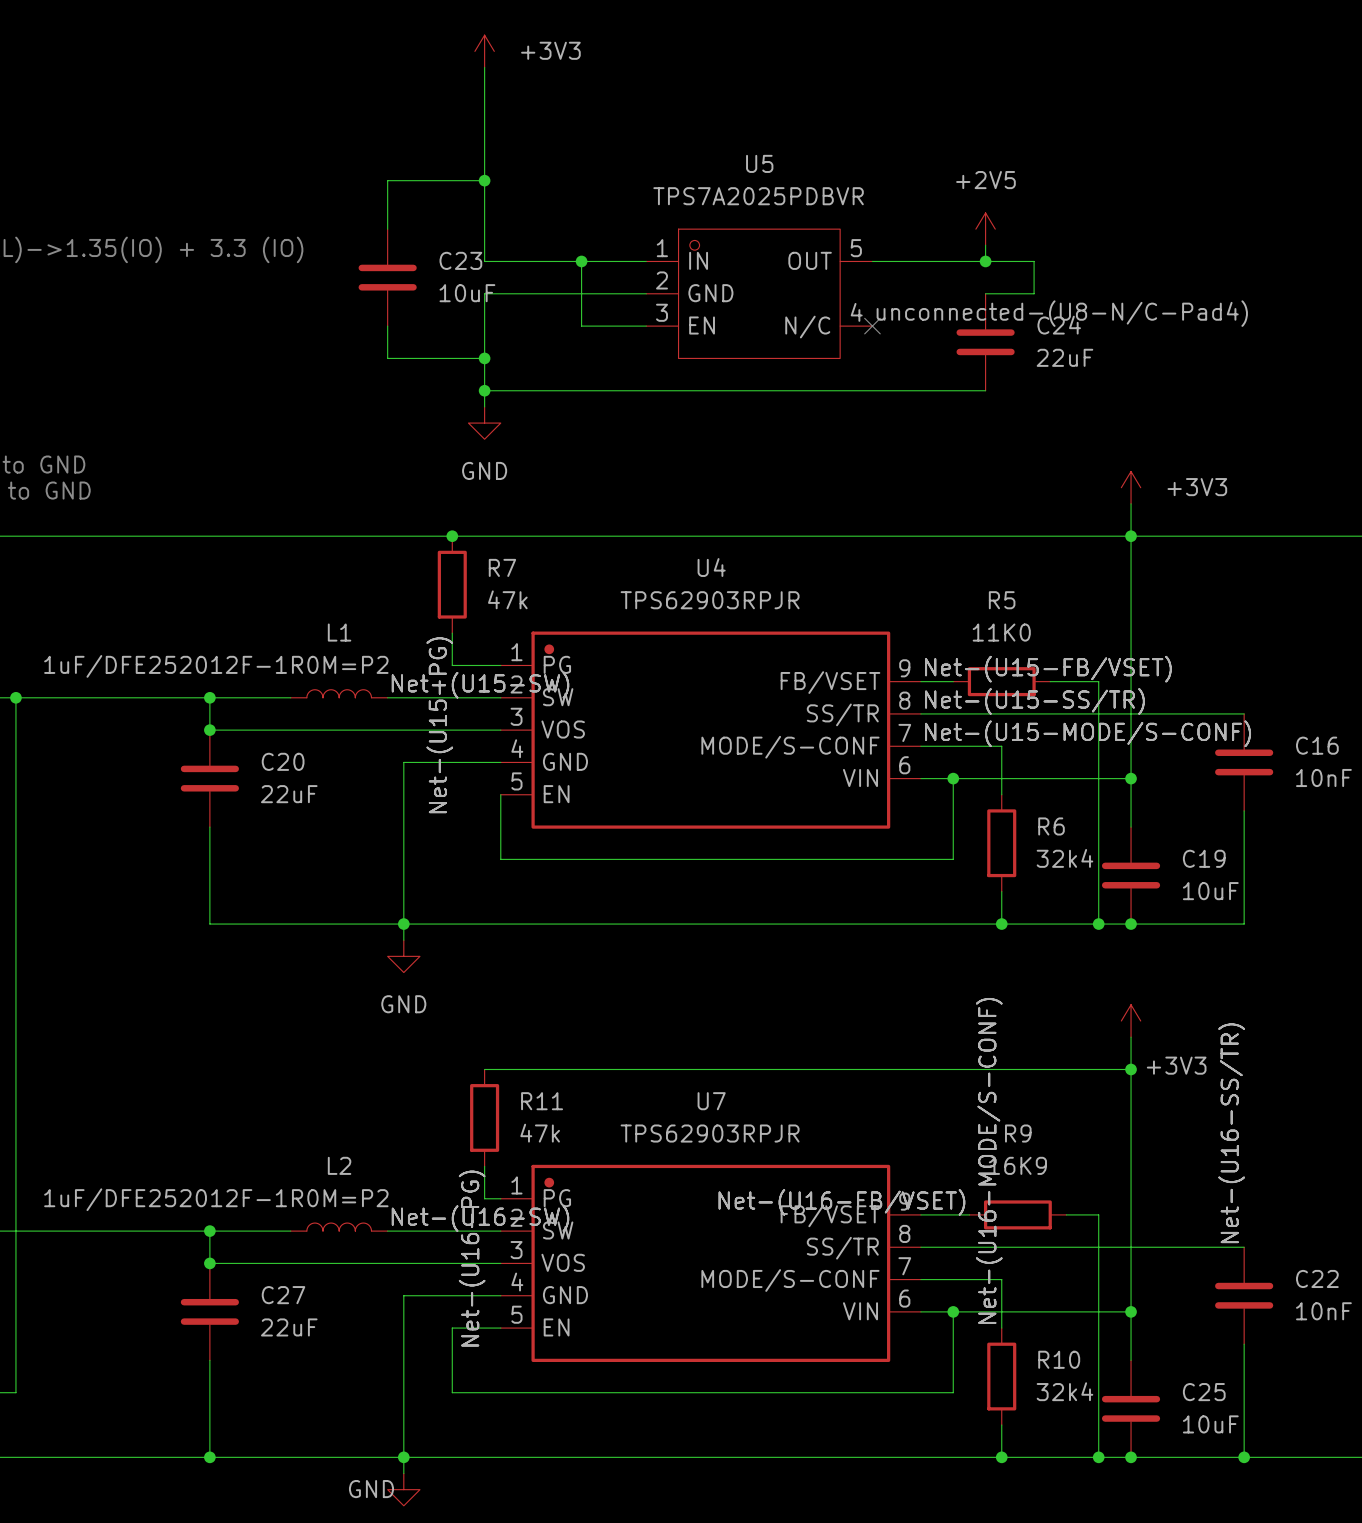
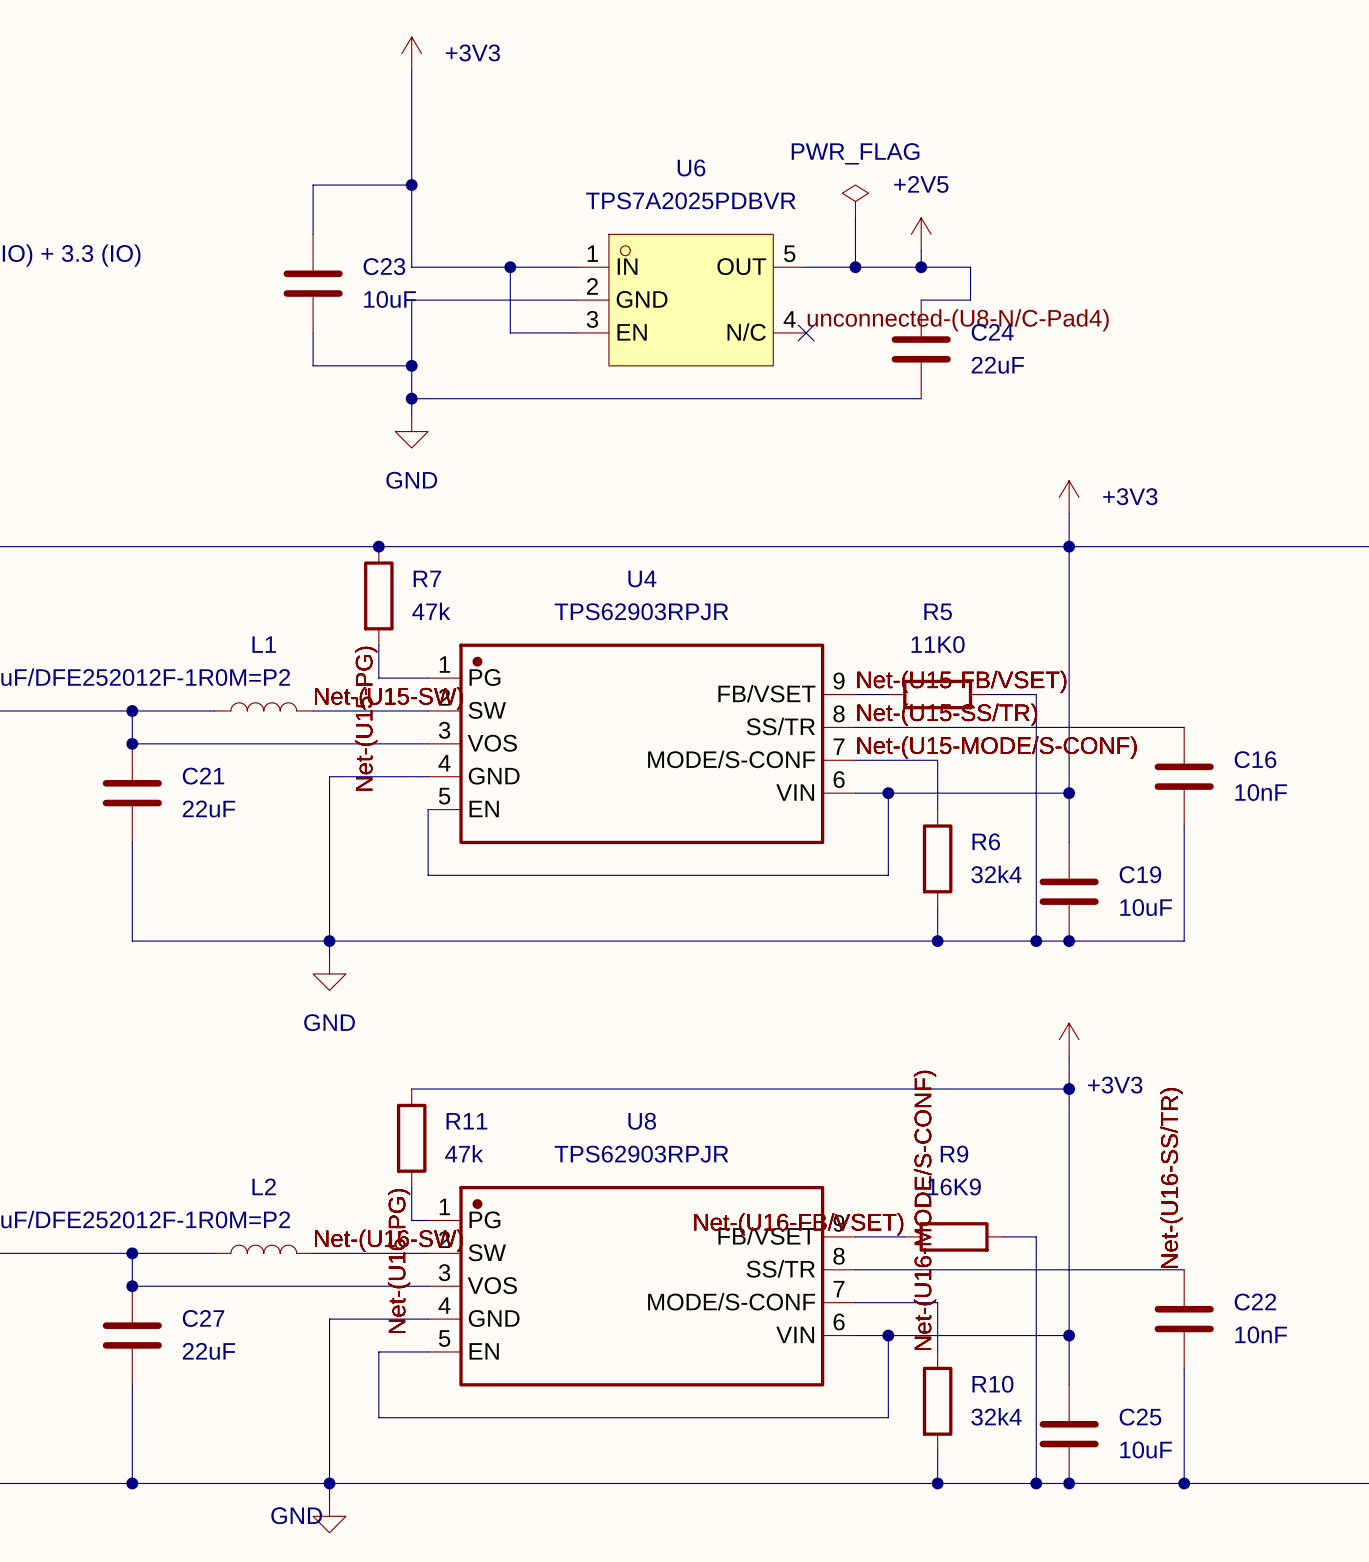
U5 name: U5 (759, 163) -> U6 (691, 167)
power symbol: none -> PWR_FLAG (855, 201)
wire: none -> (855, 217) (855, 267)
junction: none -> (855, 267)
C20 name: C20 (283, 761) -> C21 (203, 776)
U7 name: U7 (711, 1101) -> U8 (642, 1121)

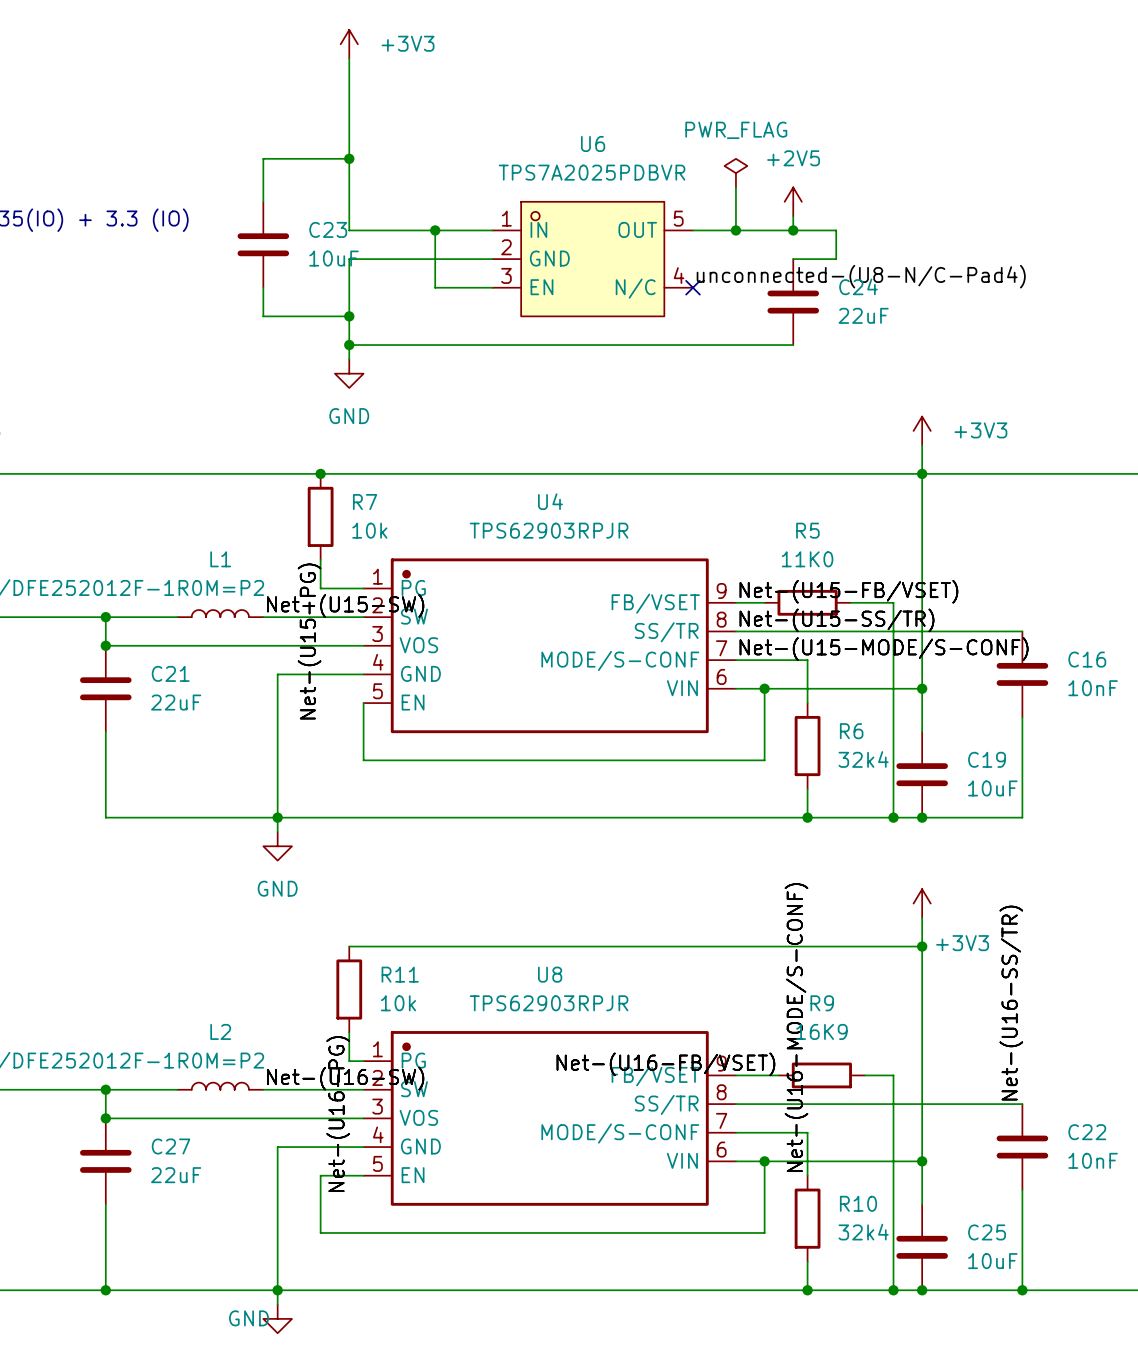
R7 value: 47k (431, 611) -> 10k (369, 530)
R11 value: 47k (464, 1153) -> 10k (398, 1003)

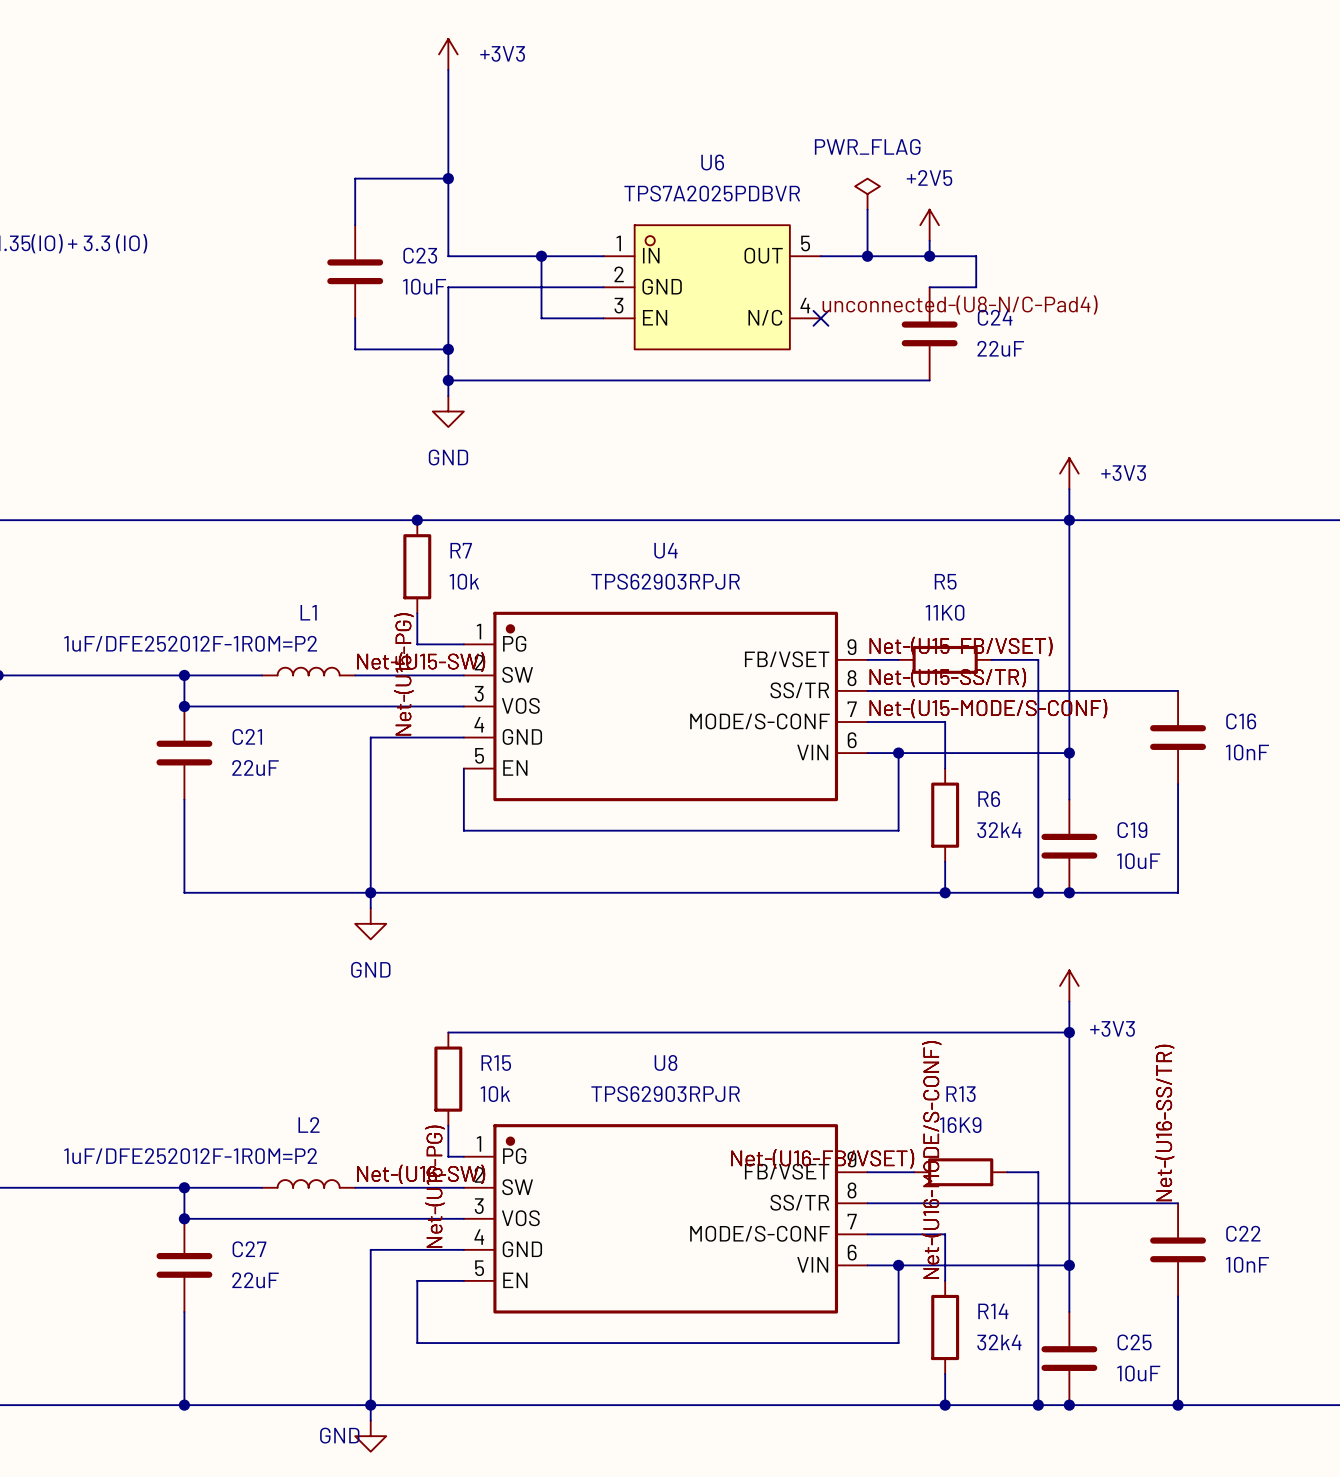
R11 name: R11 (400, 974) -> R15 (496, 1063)
R9 name: R9 (822, 1003) -> R13 (961, 1094)
R10 name: R10 (858, 1203) -> R14 (993, 1311)

